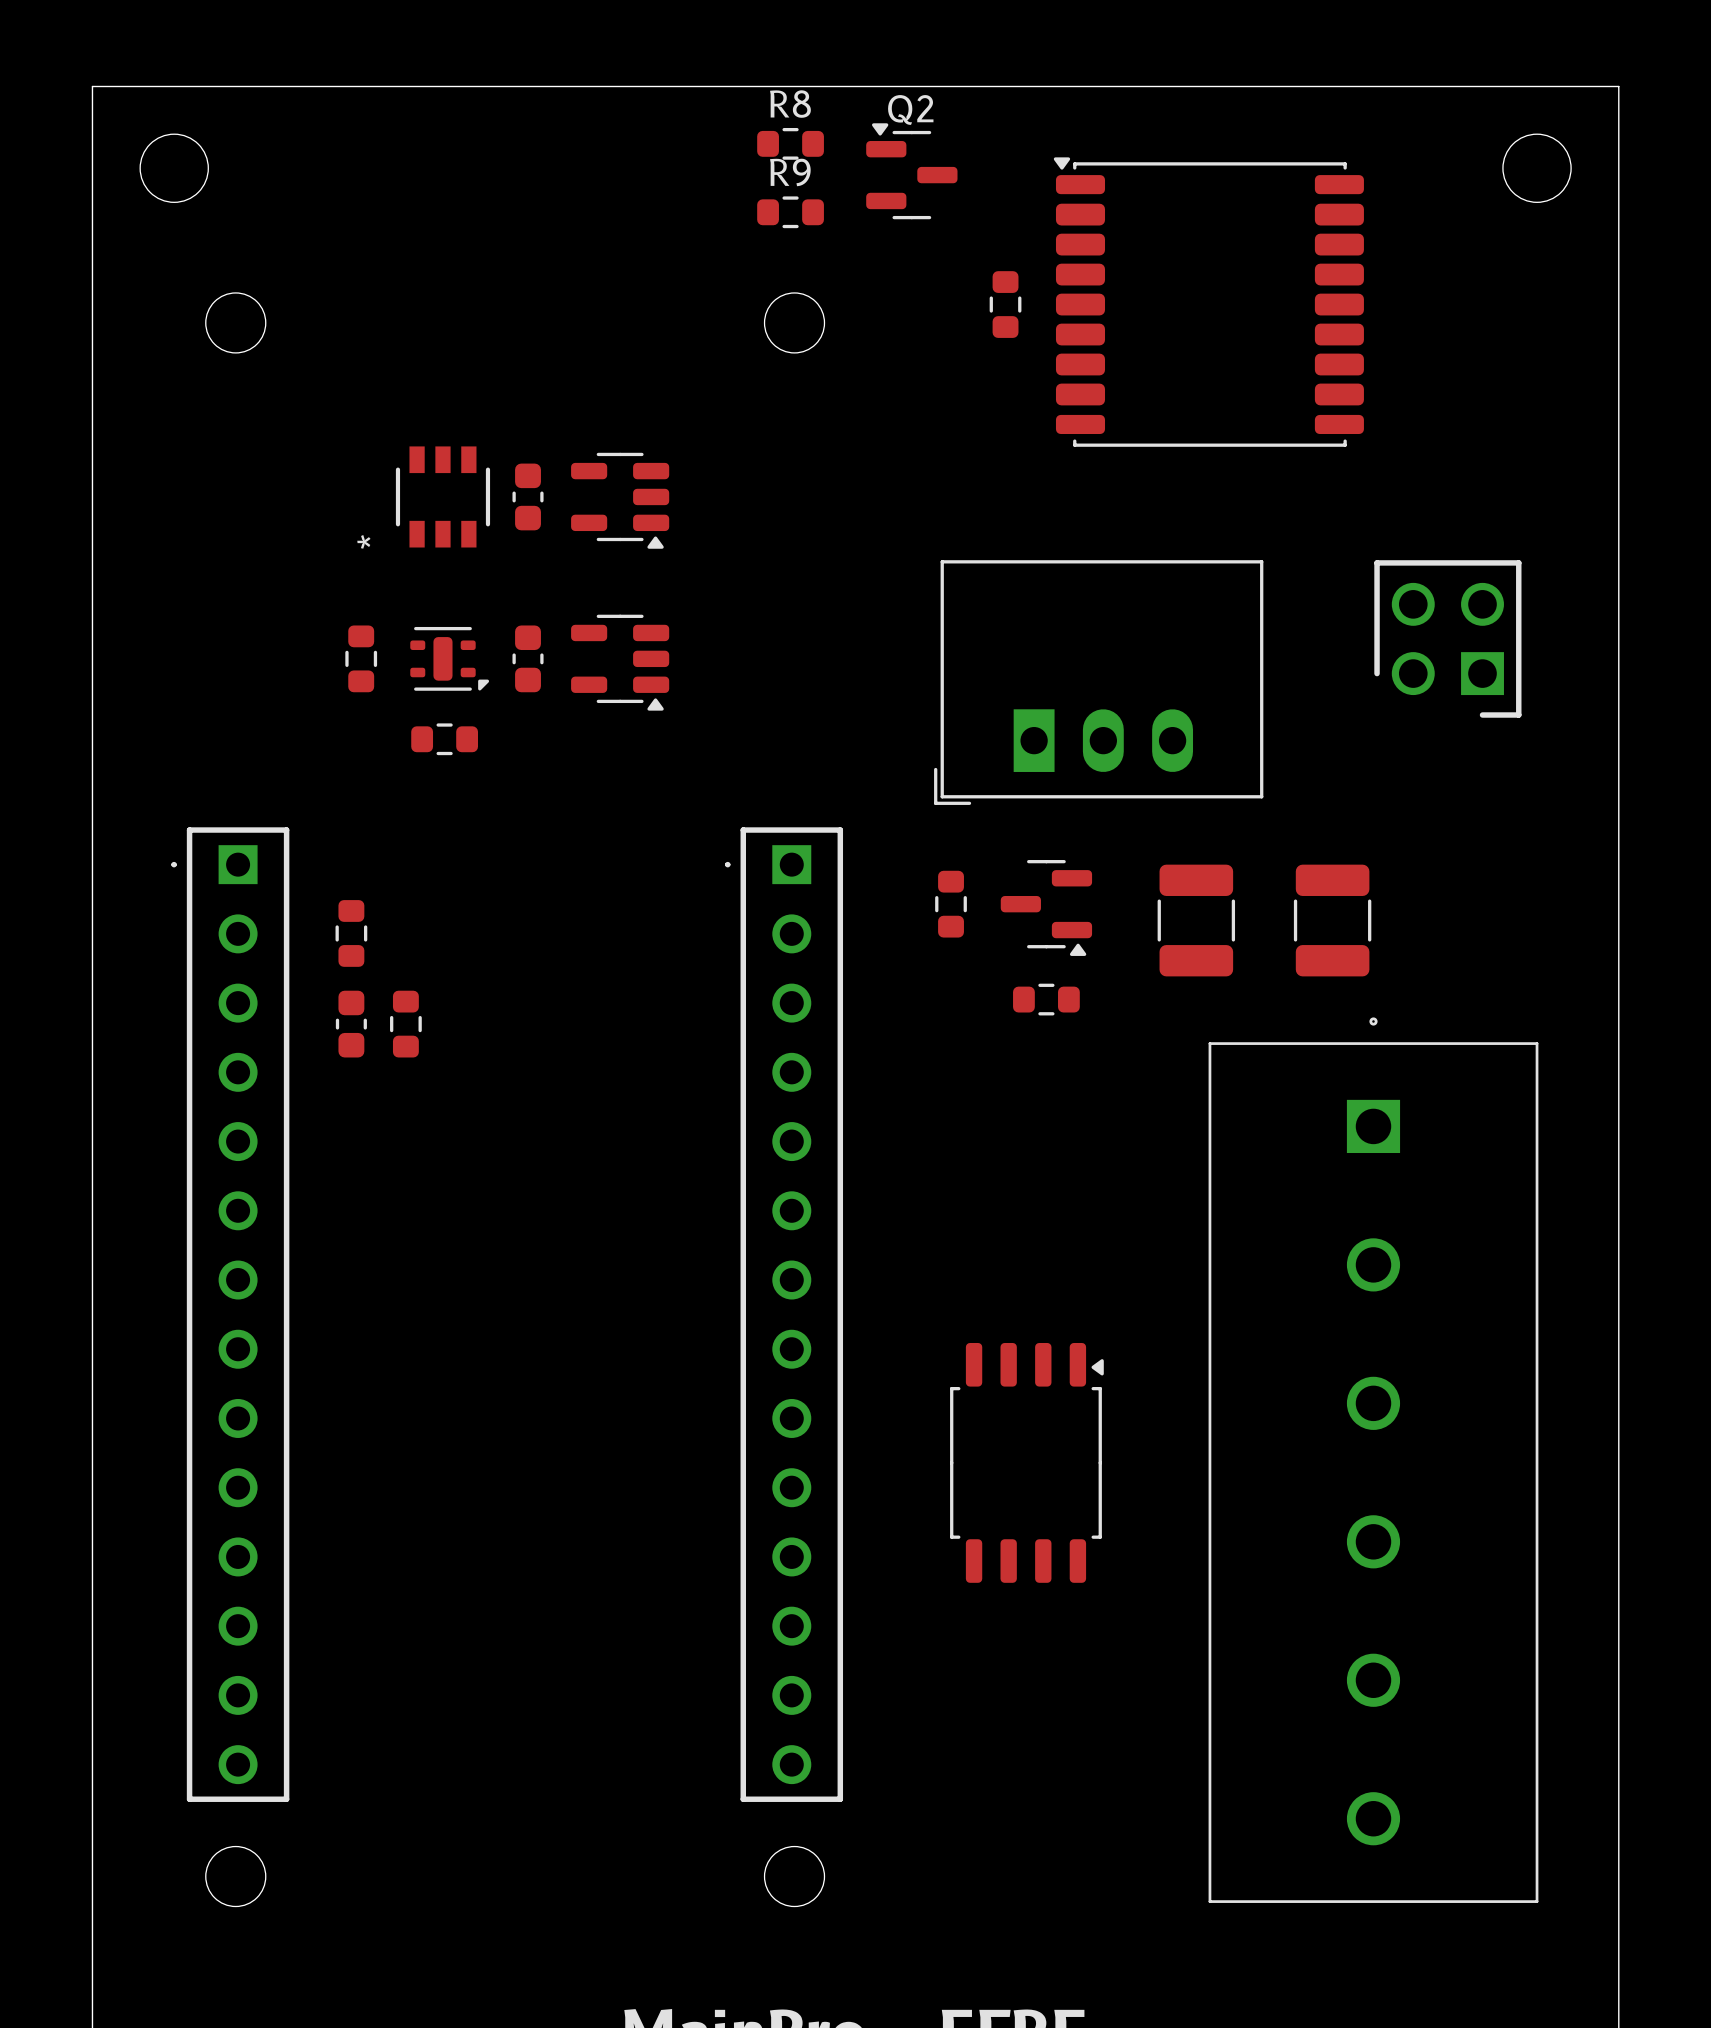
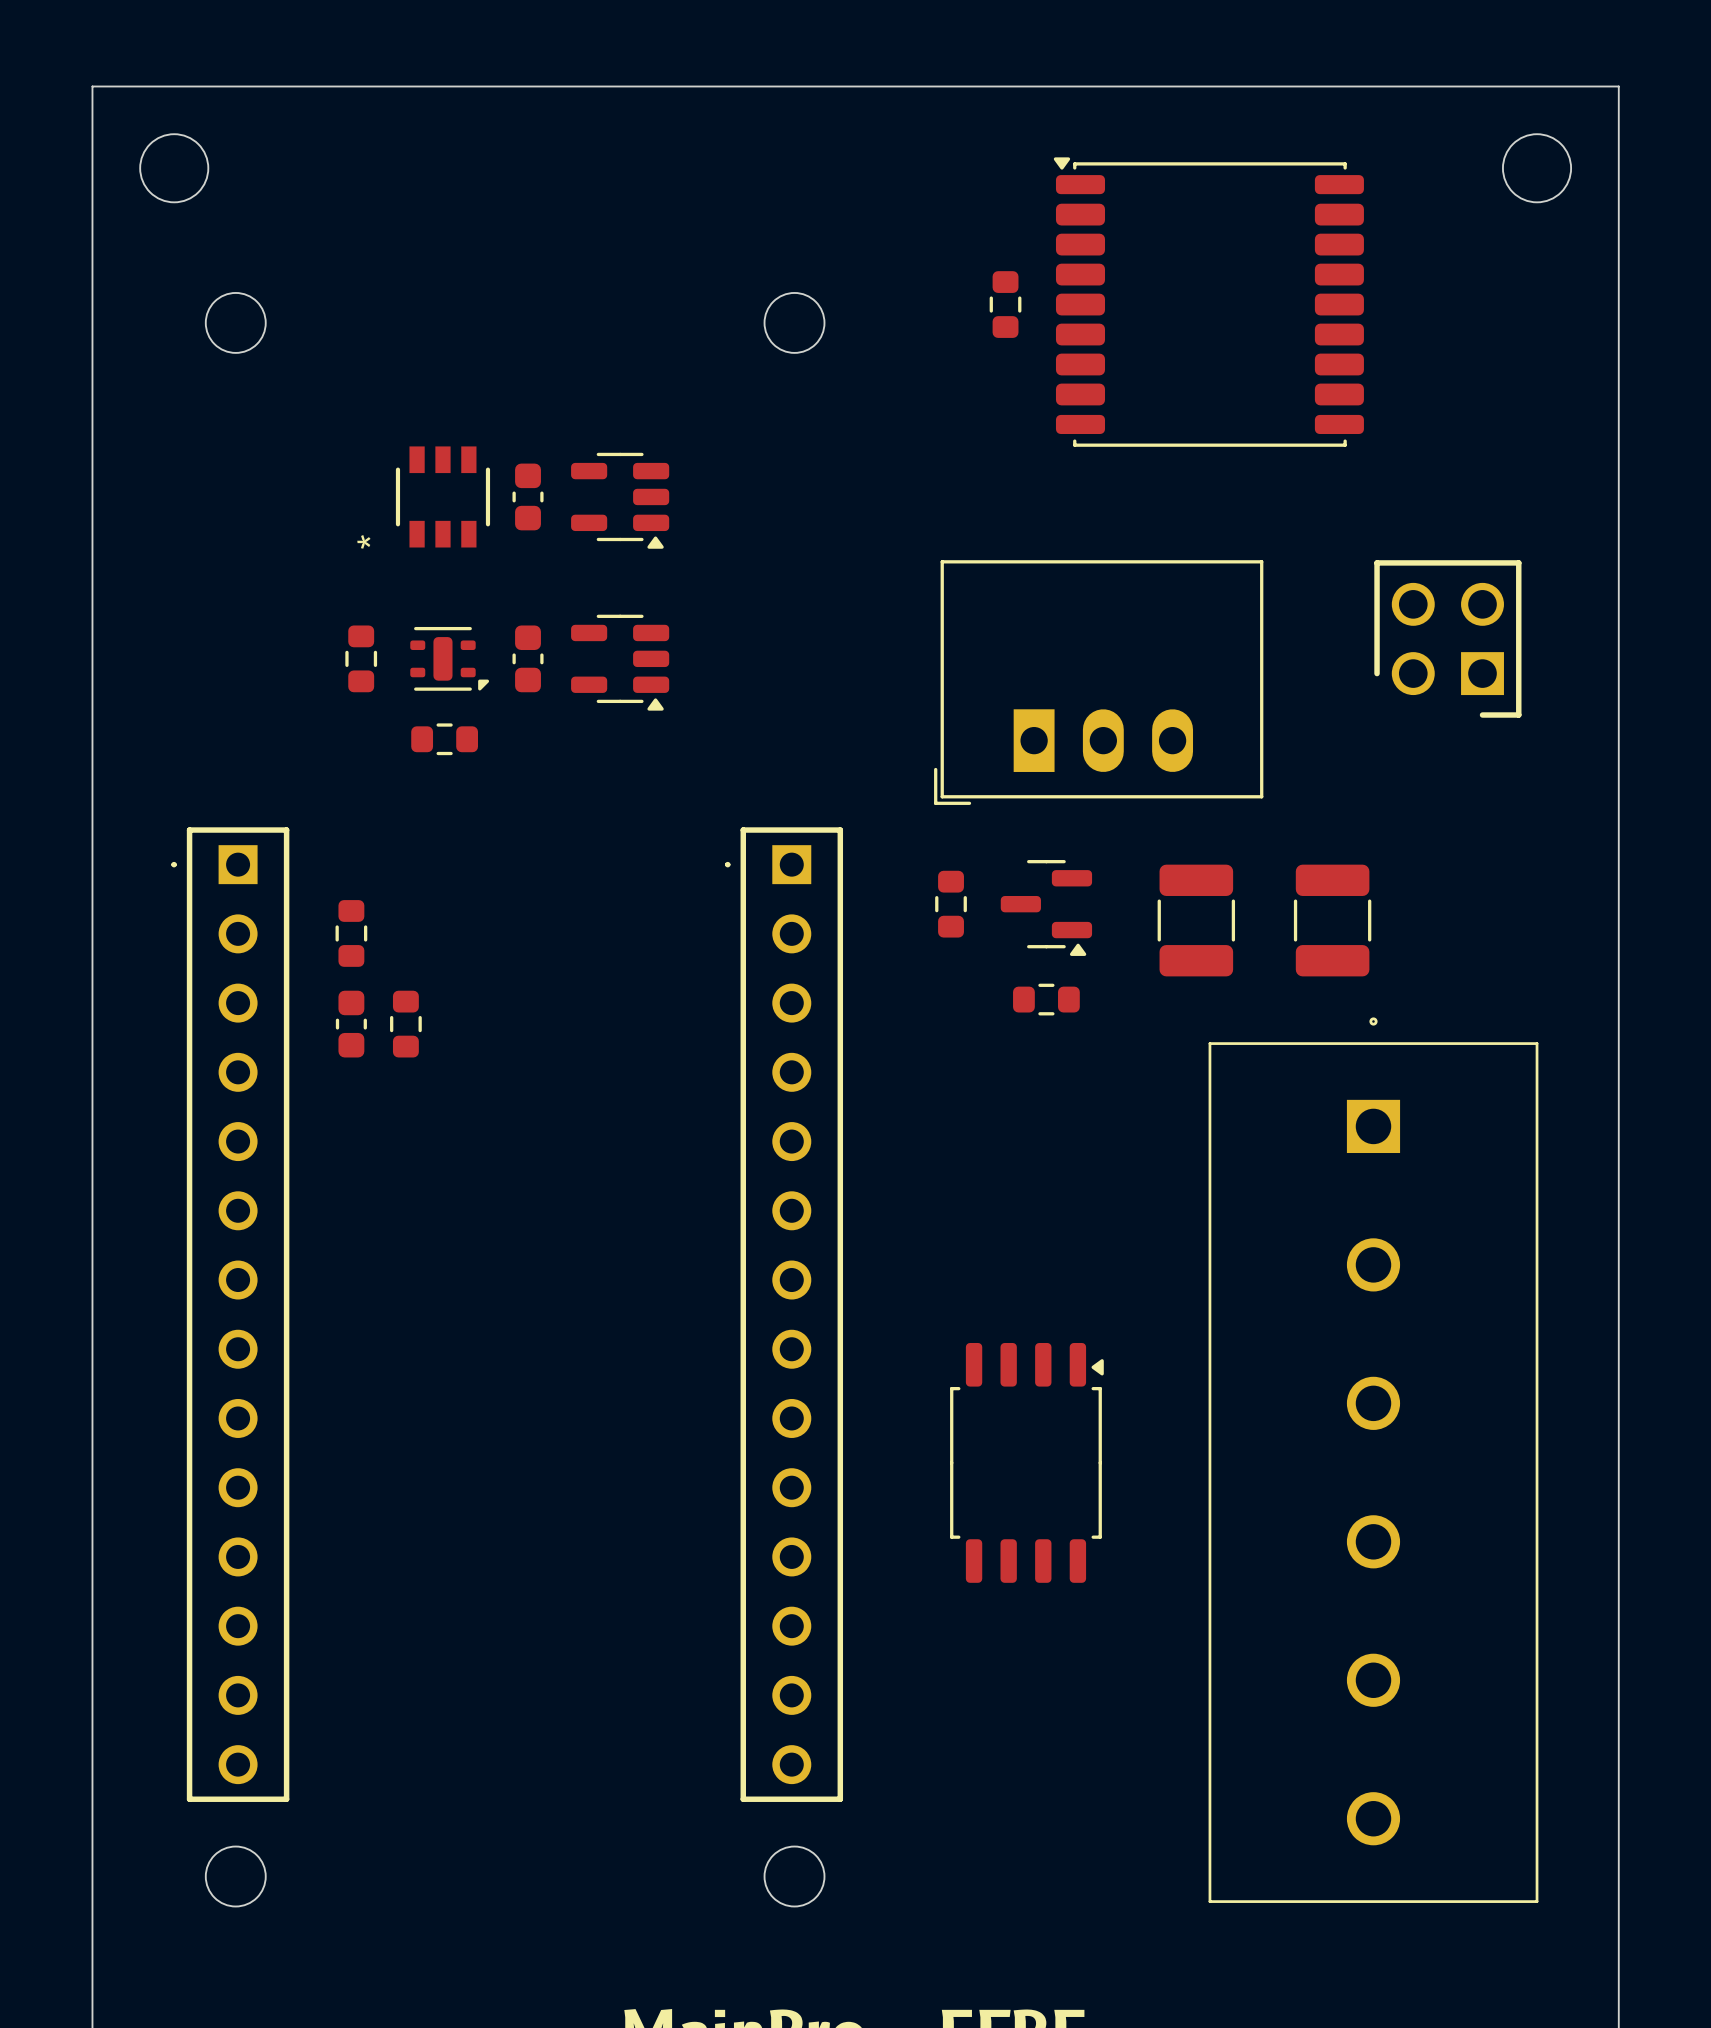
R8: (790, 143) -> none
Q2: (911, 171) -> none
R9: (790, 212) -> none

